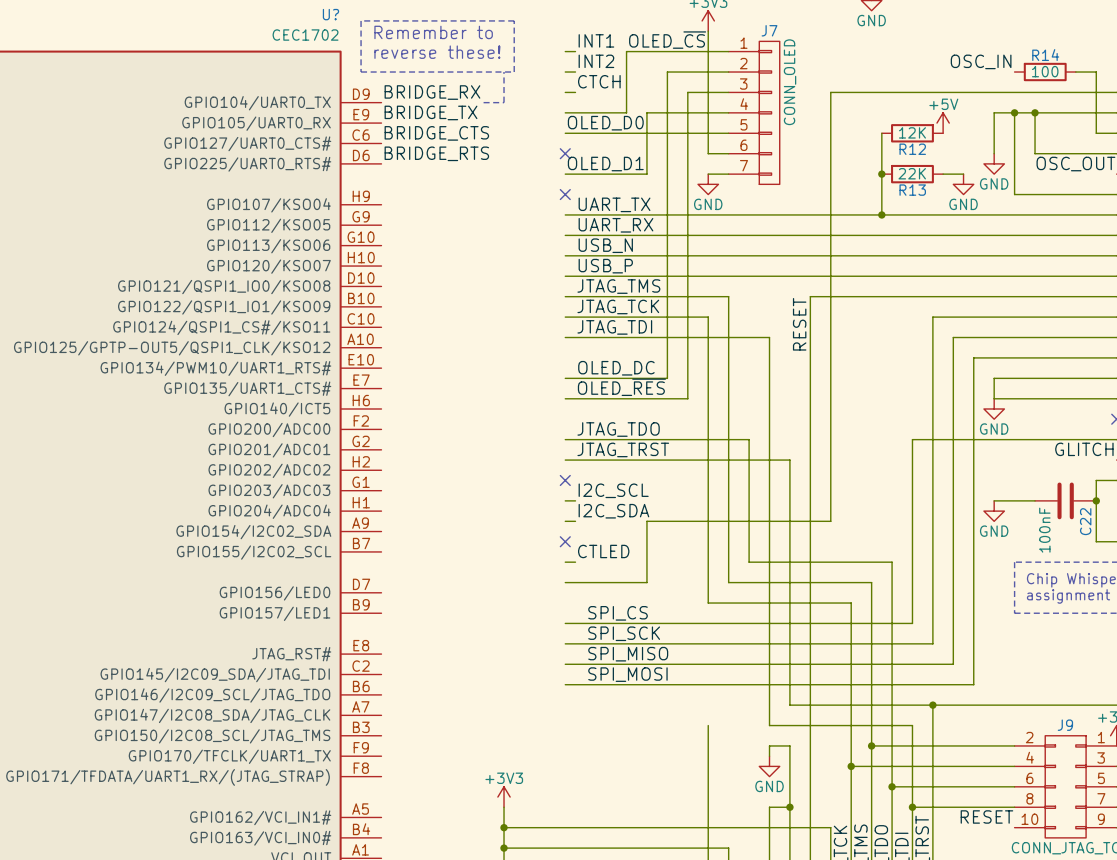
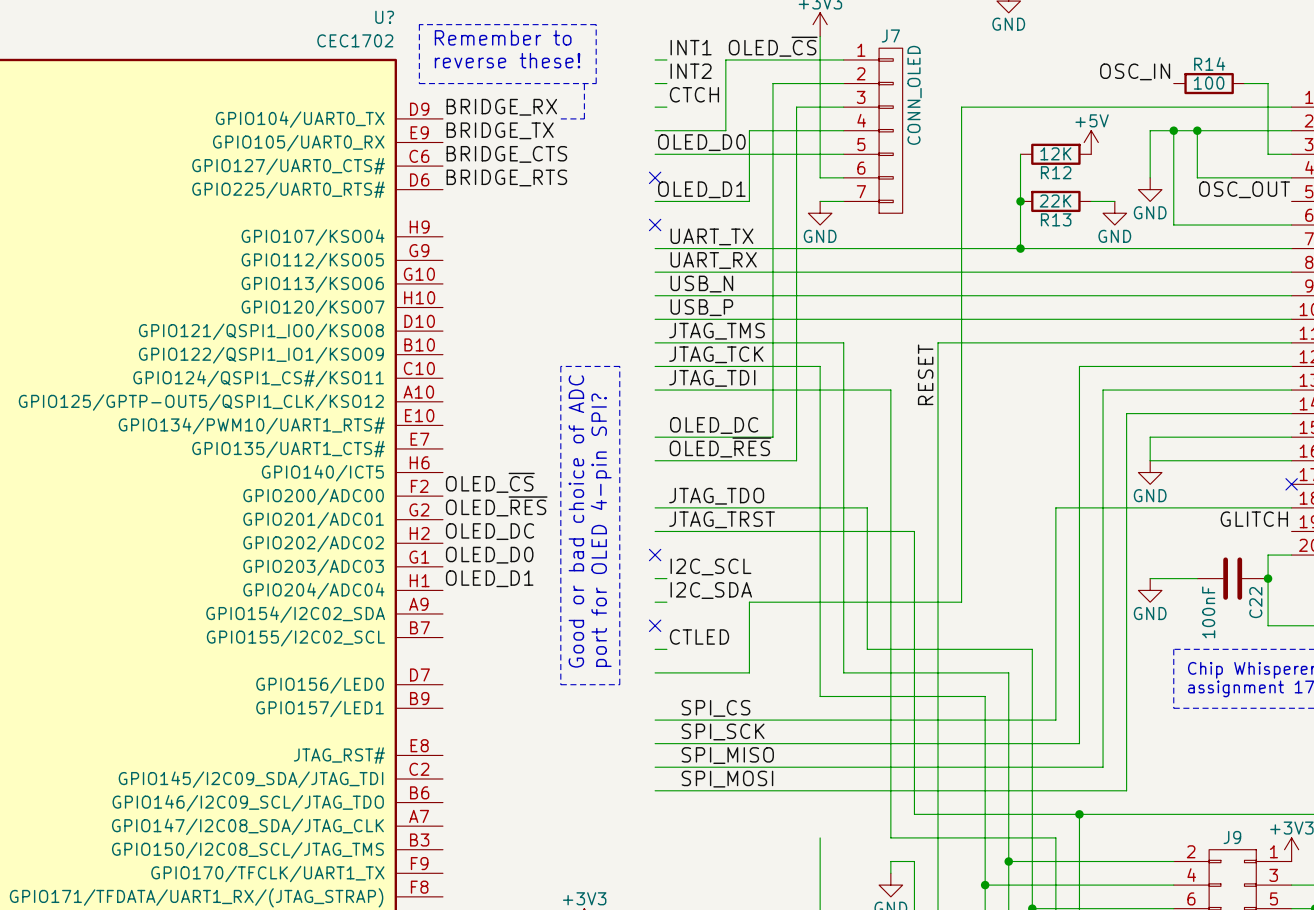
line: none -> (560, 366) (619, 366) (619, 684) (560, 684) (560, 366)
label: none -> OLED_~{CS} (490, 482)
label: none -> OLED_~{RES} (496, 506)
text: none -> Good or bad choice of ADC (576, 521)
text: none -> port for OLED 4-pin SPI? (601, 530)
label: none -> OLED_DC (490, 531)
label: none -> OLED_D0 (489, 555)
label: none -> OLED_D1 (489, 578)

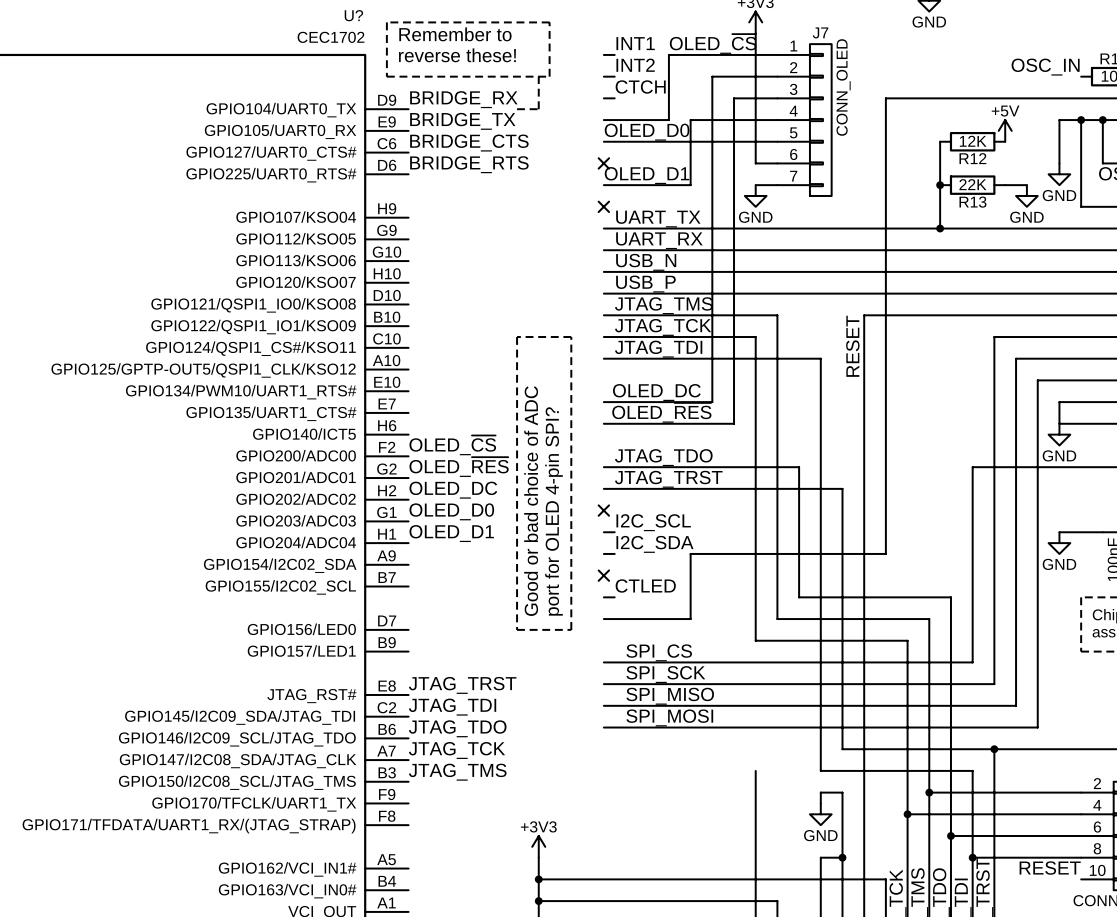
label: none -> JTAG_TRST (462, 685)
label: none -> JTAG_TDI (452, 707)
label: none -> JTAG_TDO (457, 728)
label: none -> JTAG_TCK (456, 750)
label: none -> JTAG_TMS (457, 772)

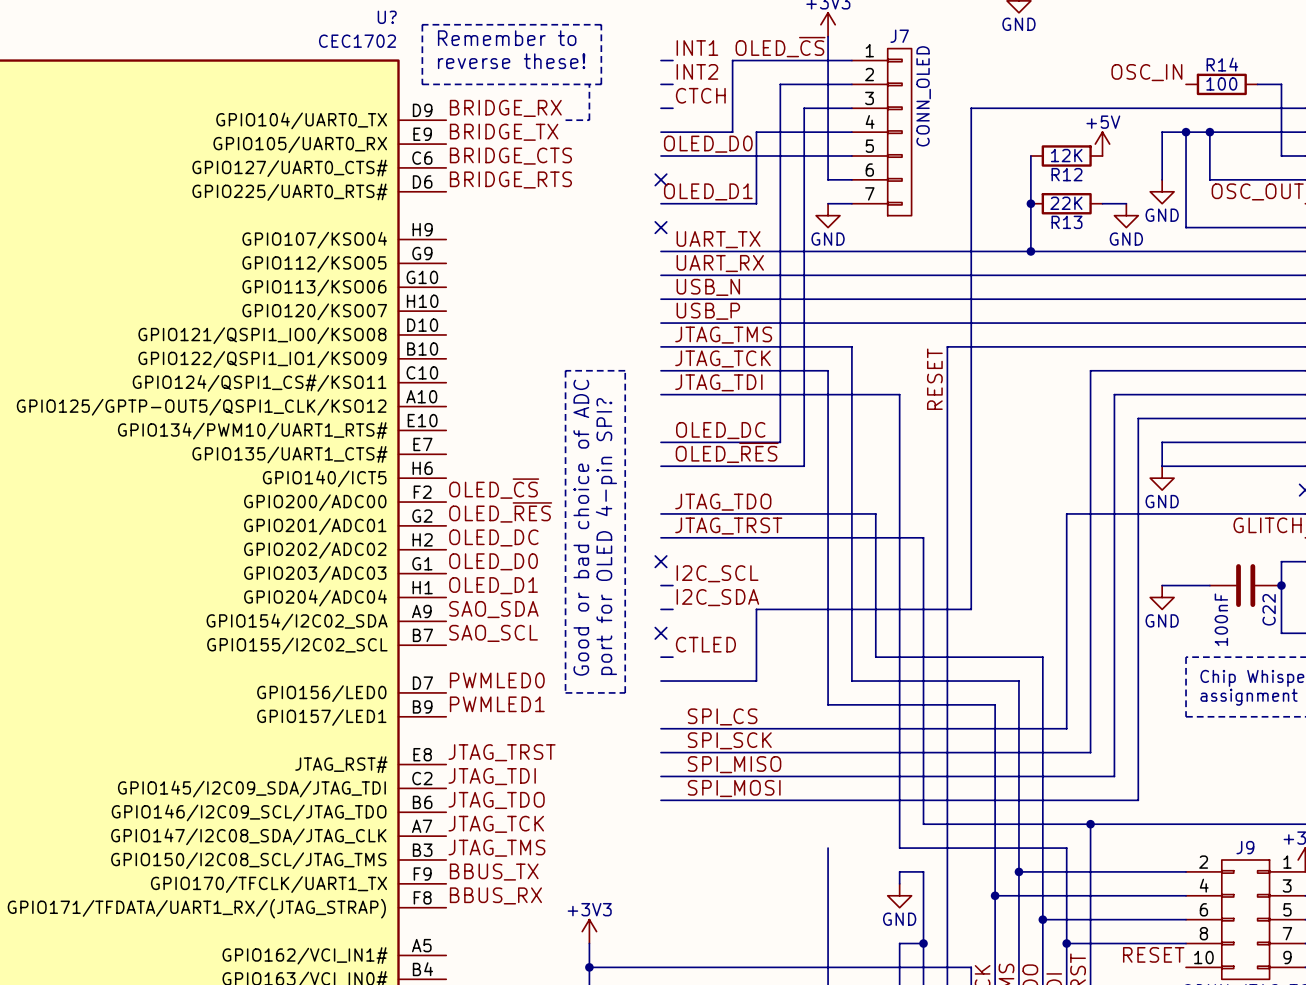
label: none -> SAO_SDA (493, 609)
label: none -> SAO_SCL (493, 633)
label: none -> PWMLED0 (497, 680)
label: none -> PWMLED1 (497, 704)
label: none -> BBUS_TX (494, 872)
label: none -> BBUS_RX (495, 895)

